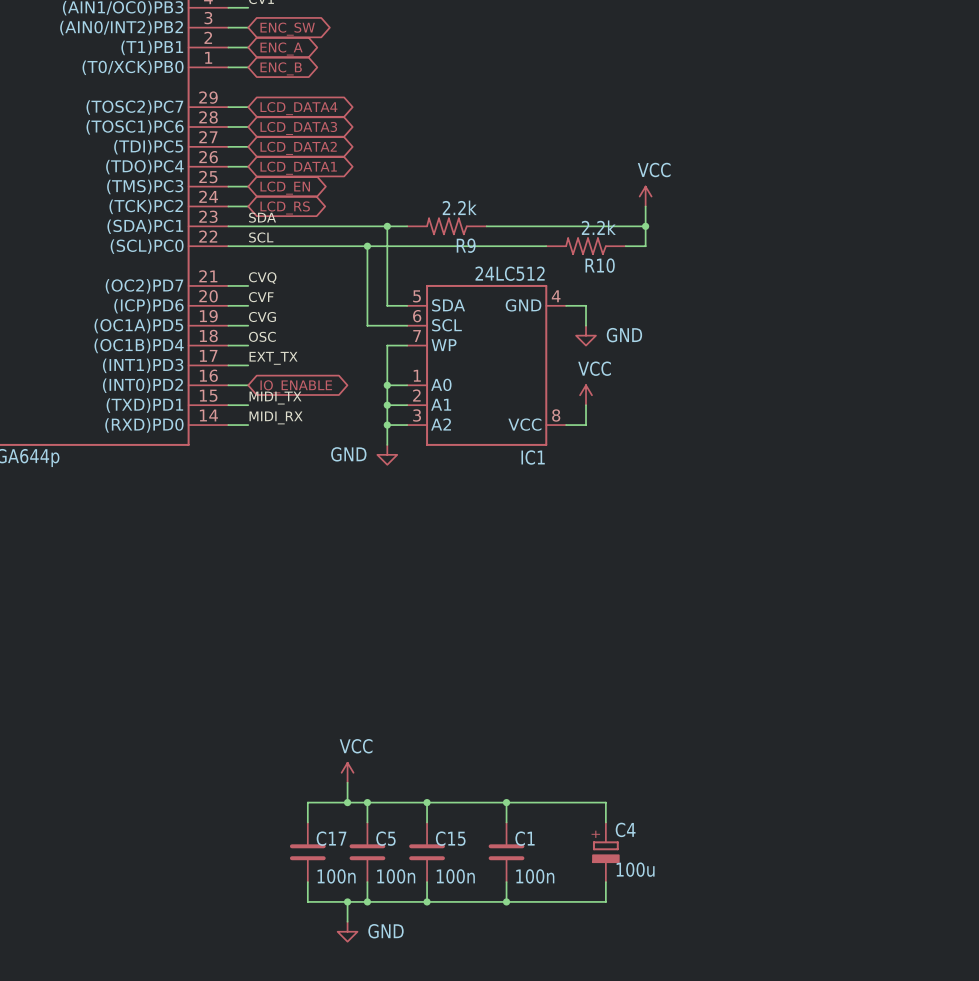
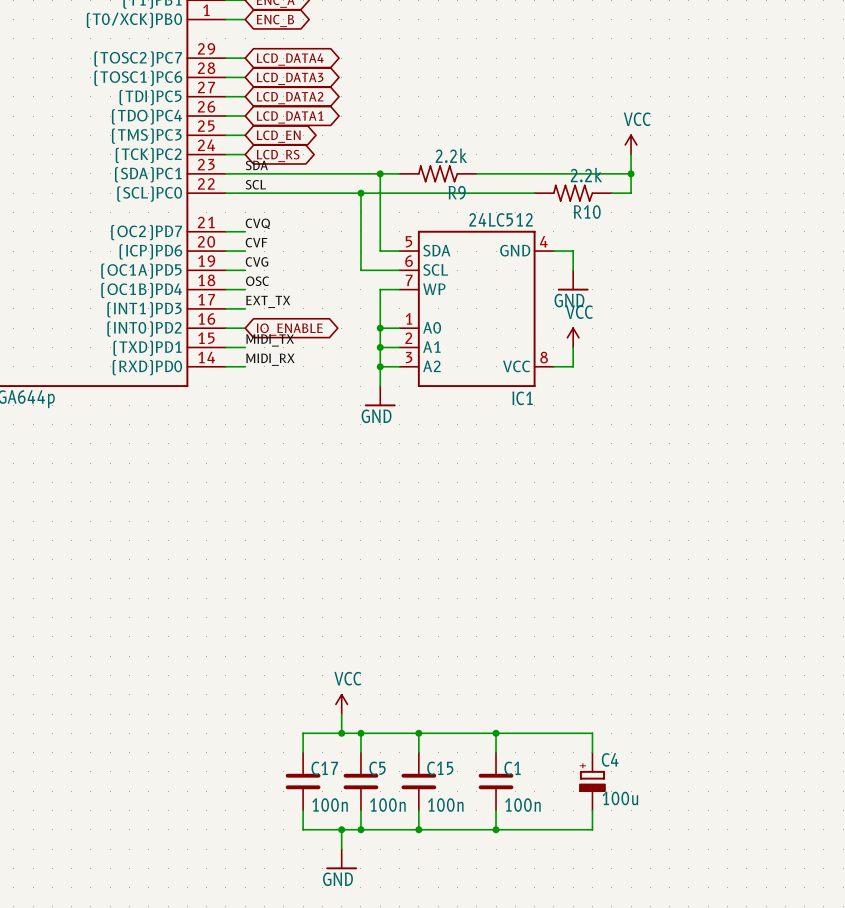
power symbol shape: [576, 325, 596, 346] -> [557, 270, 589, 291]
power symbol text position: GND (624, 335) -> GND (569, 300)
power symbol shape: [377, 444, 398, 465] -> [364, 386, 396, 407]
power symbol text position: GND (348, 454) -> GND (376, 416)
power symbol shape: [337, 921, 358, 942] -> [326, 849, 358, 870]
power symbol text position: GND (386, 931) -> GND (337, 879)

